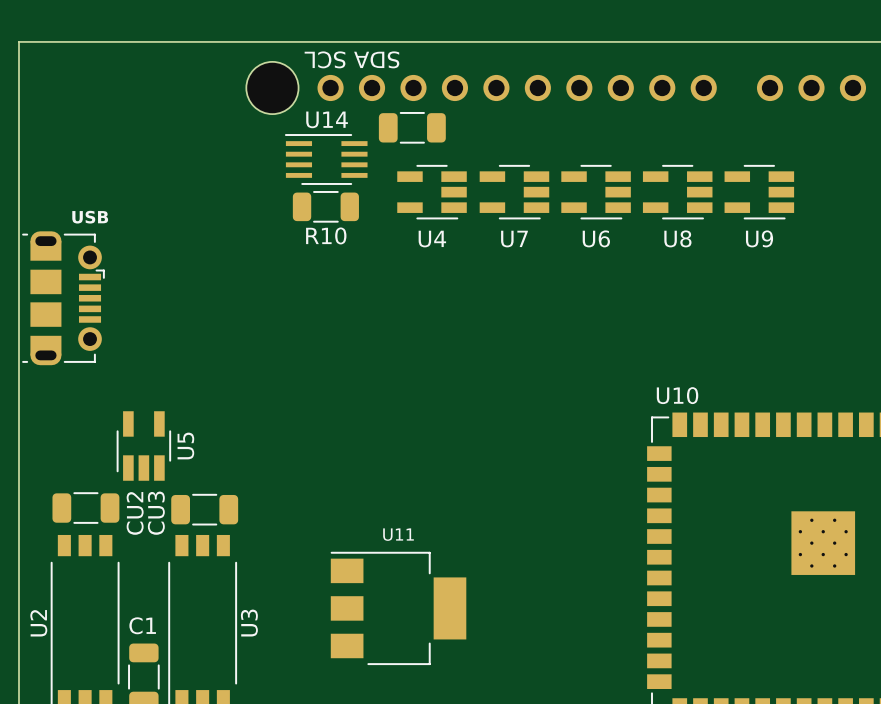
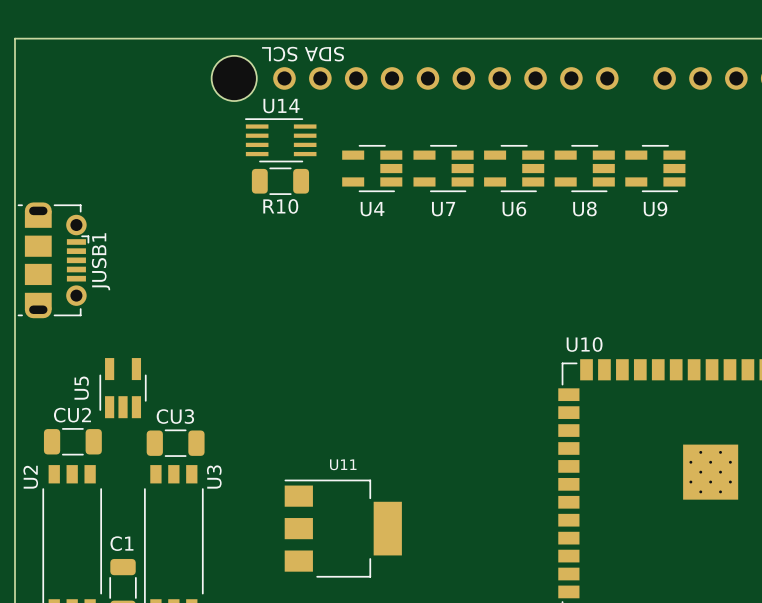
part: (412, 127) -> none
text: USB (90, 217) -> none
JUSB1 name: none -> JUSB1 (101, 261)
U5 name position: U5 (185, 446) -> U5 (81, 388)
CU2 name rotation: 0° (135, 513) -> 90° clockwise (72, 415)
CU2 name position: CU2 (135, 513) -> CU2 (72, 415)
CU3 name rotation: 0° (156, 513) -> 90° clockwise (175, 416)
U2 name position: U2 (38, 623) -> U2 (30, 477)
U3 name position: U3 (249, 623) -> U3 (214, 477)

